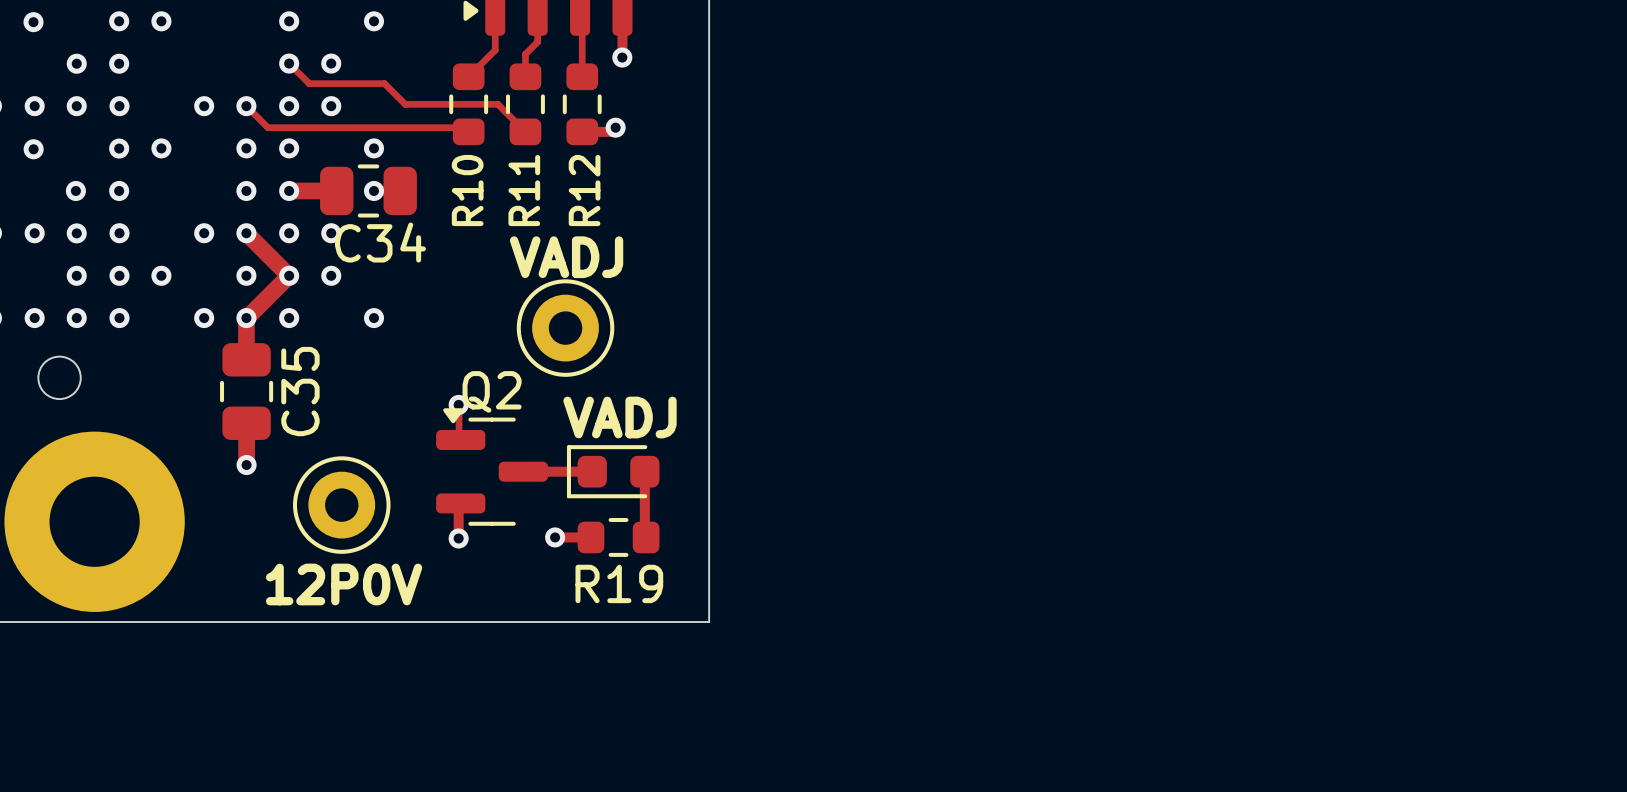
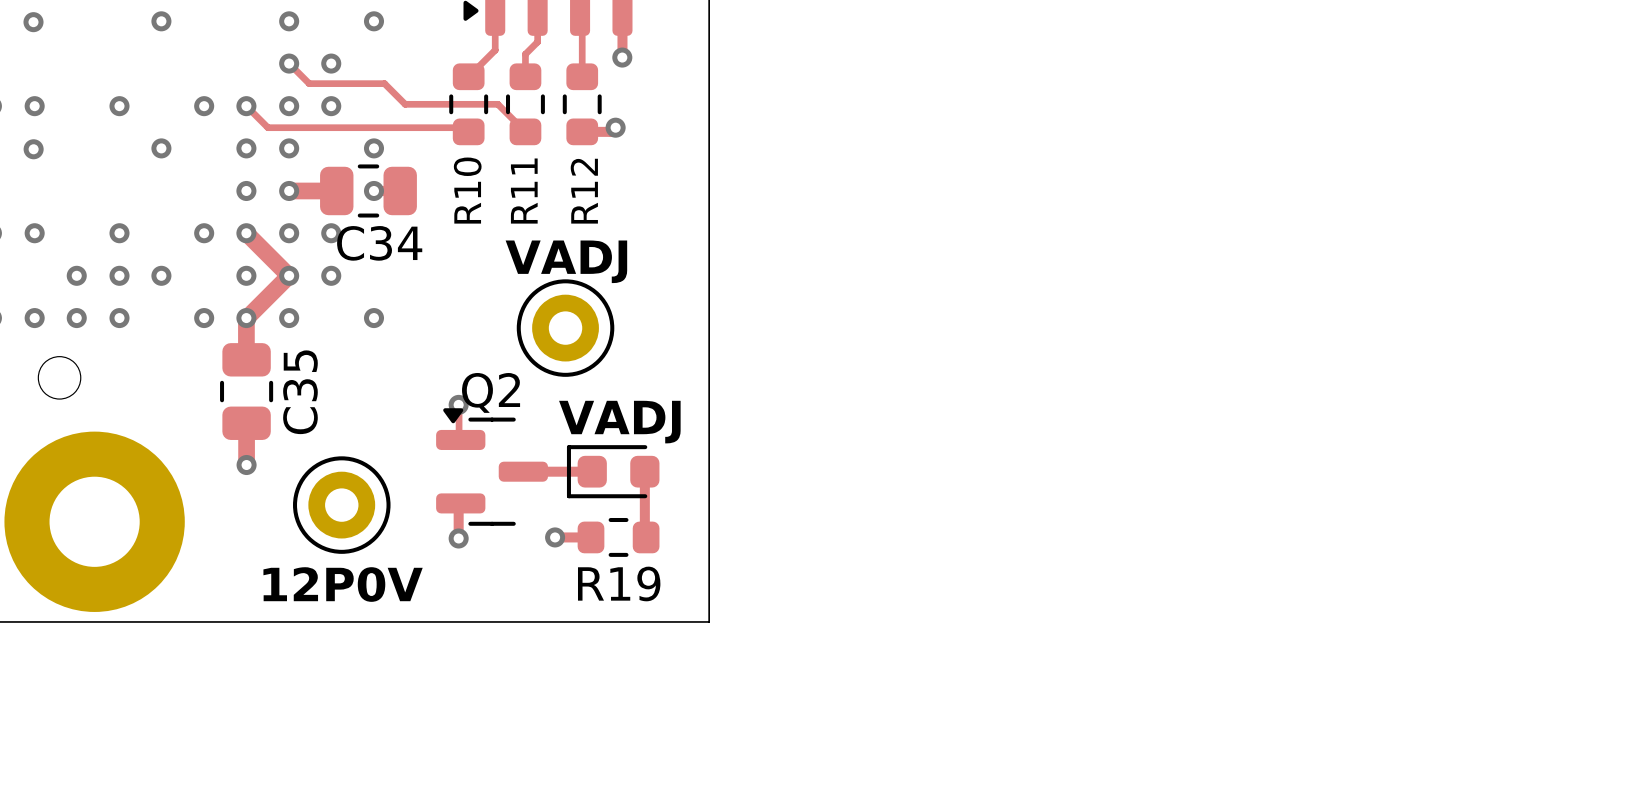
via: (119, 21) -> none
via: (76, 63) -> none
via: (119, 63) -> none
via: (76, 106) -> none
via: (119, 148) -> none
via: (75, 190) -> none
via: (119, 190) -> none
via: (76, 233) -> none

